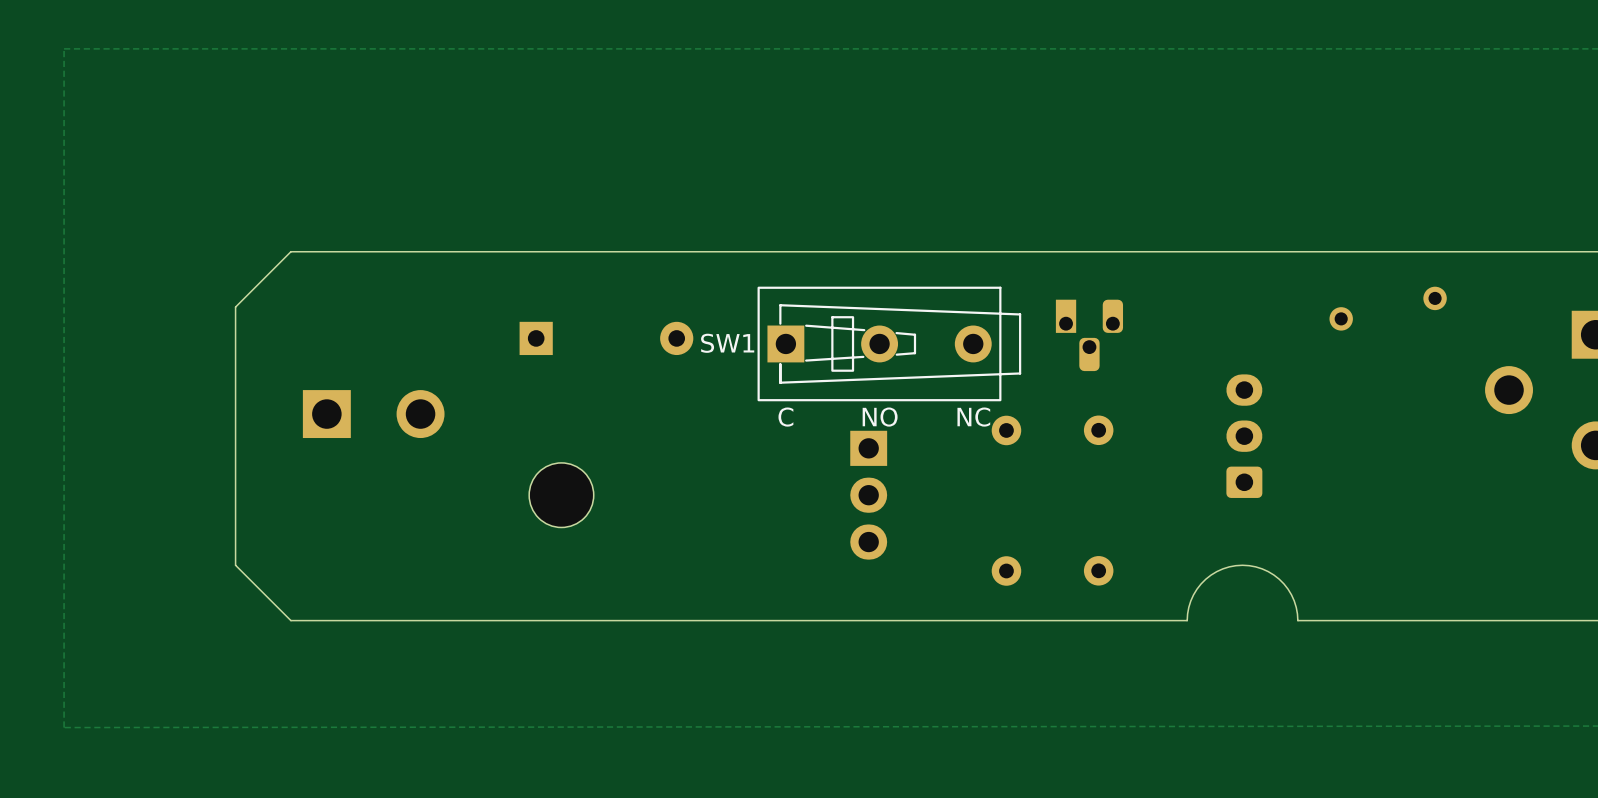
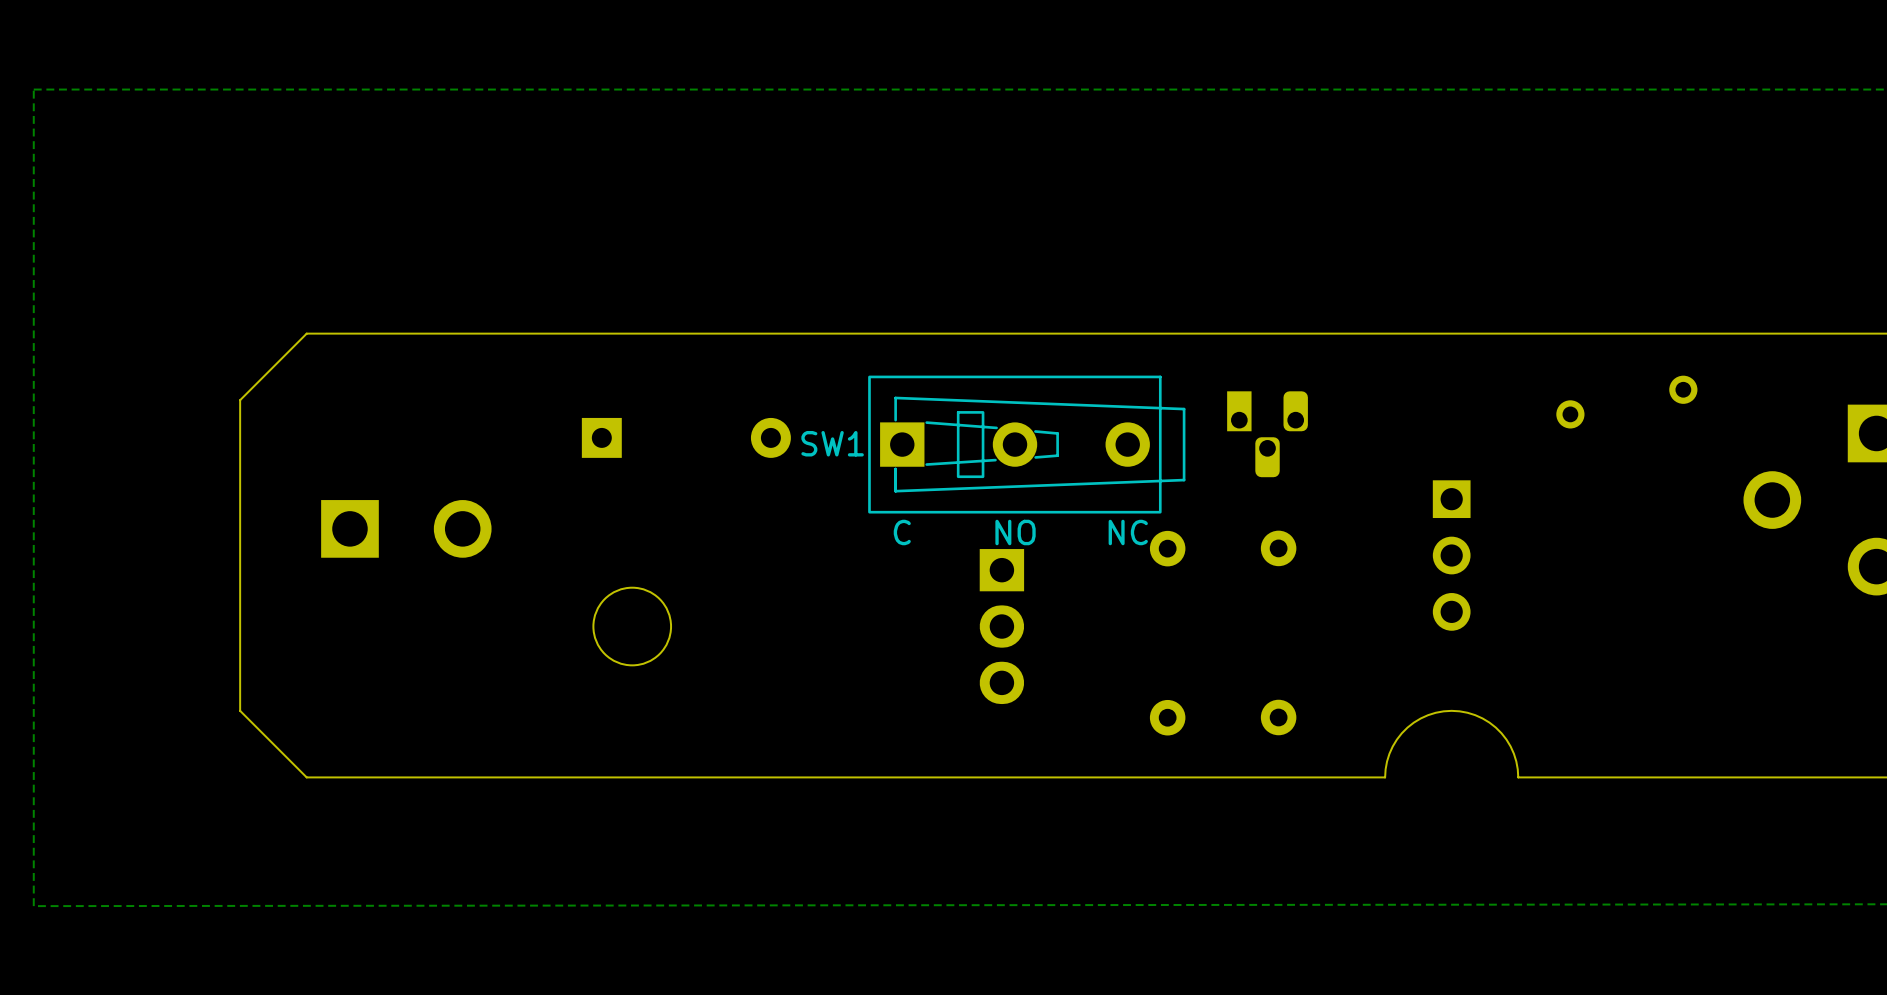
part footprint: [1226, 374, 1263, 498] -> [1432, 480, 1471, 631]

